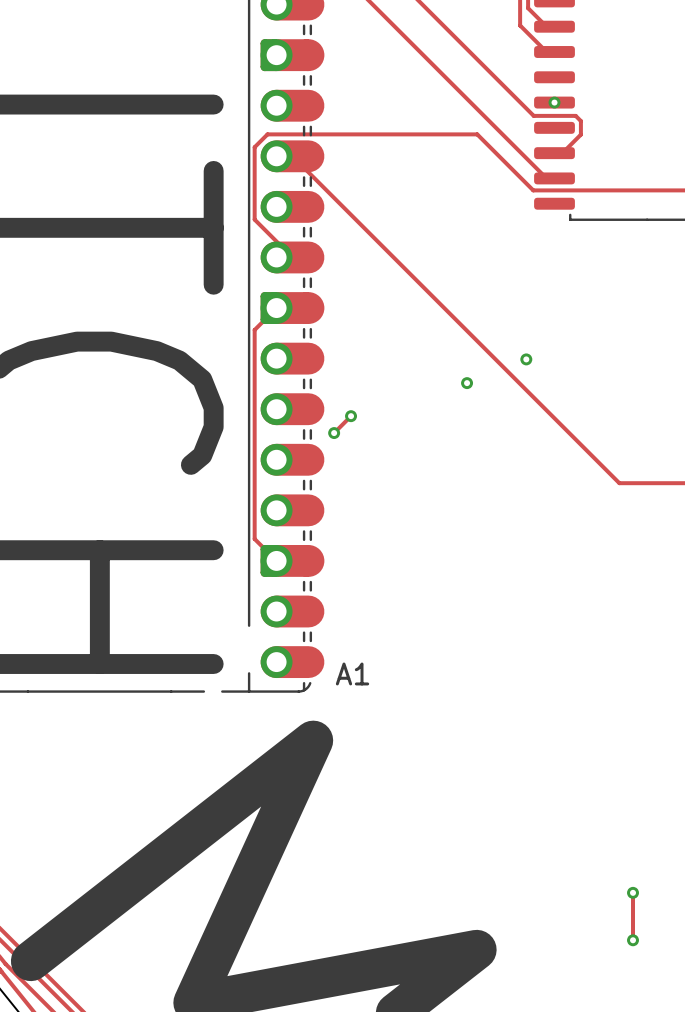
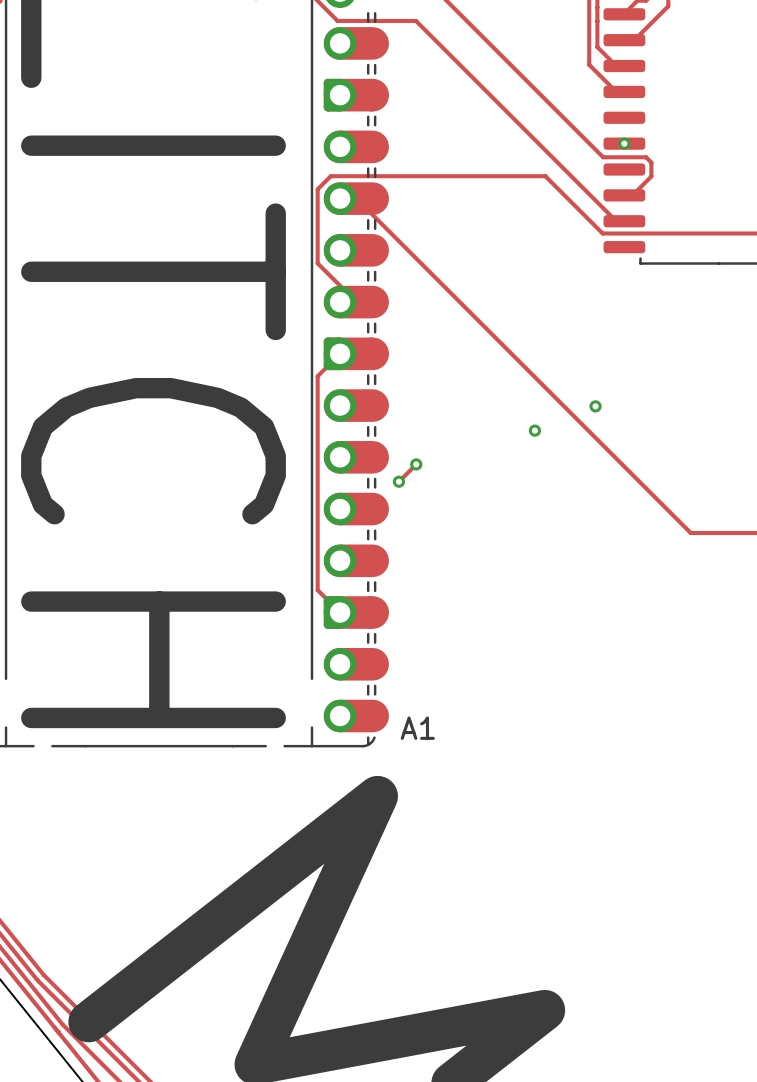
track: (633, 892) (633, 940) -> none
via: (633, 892) -> none
via: (633, 940) -> none

